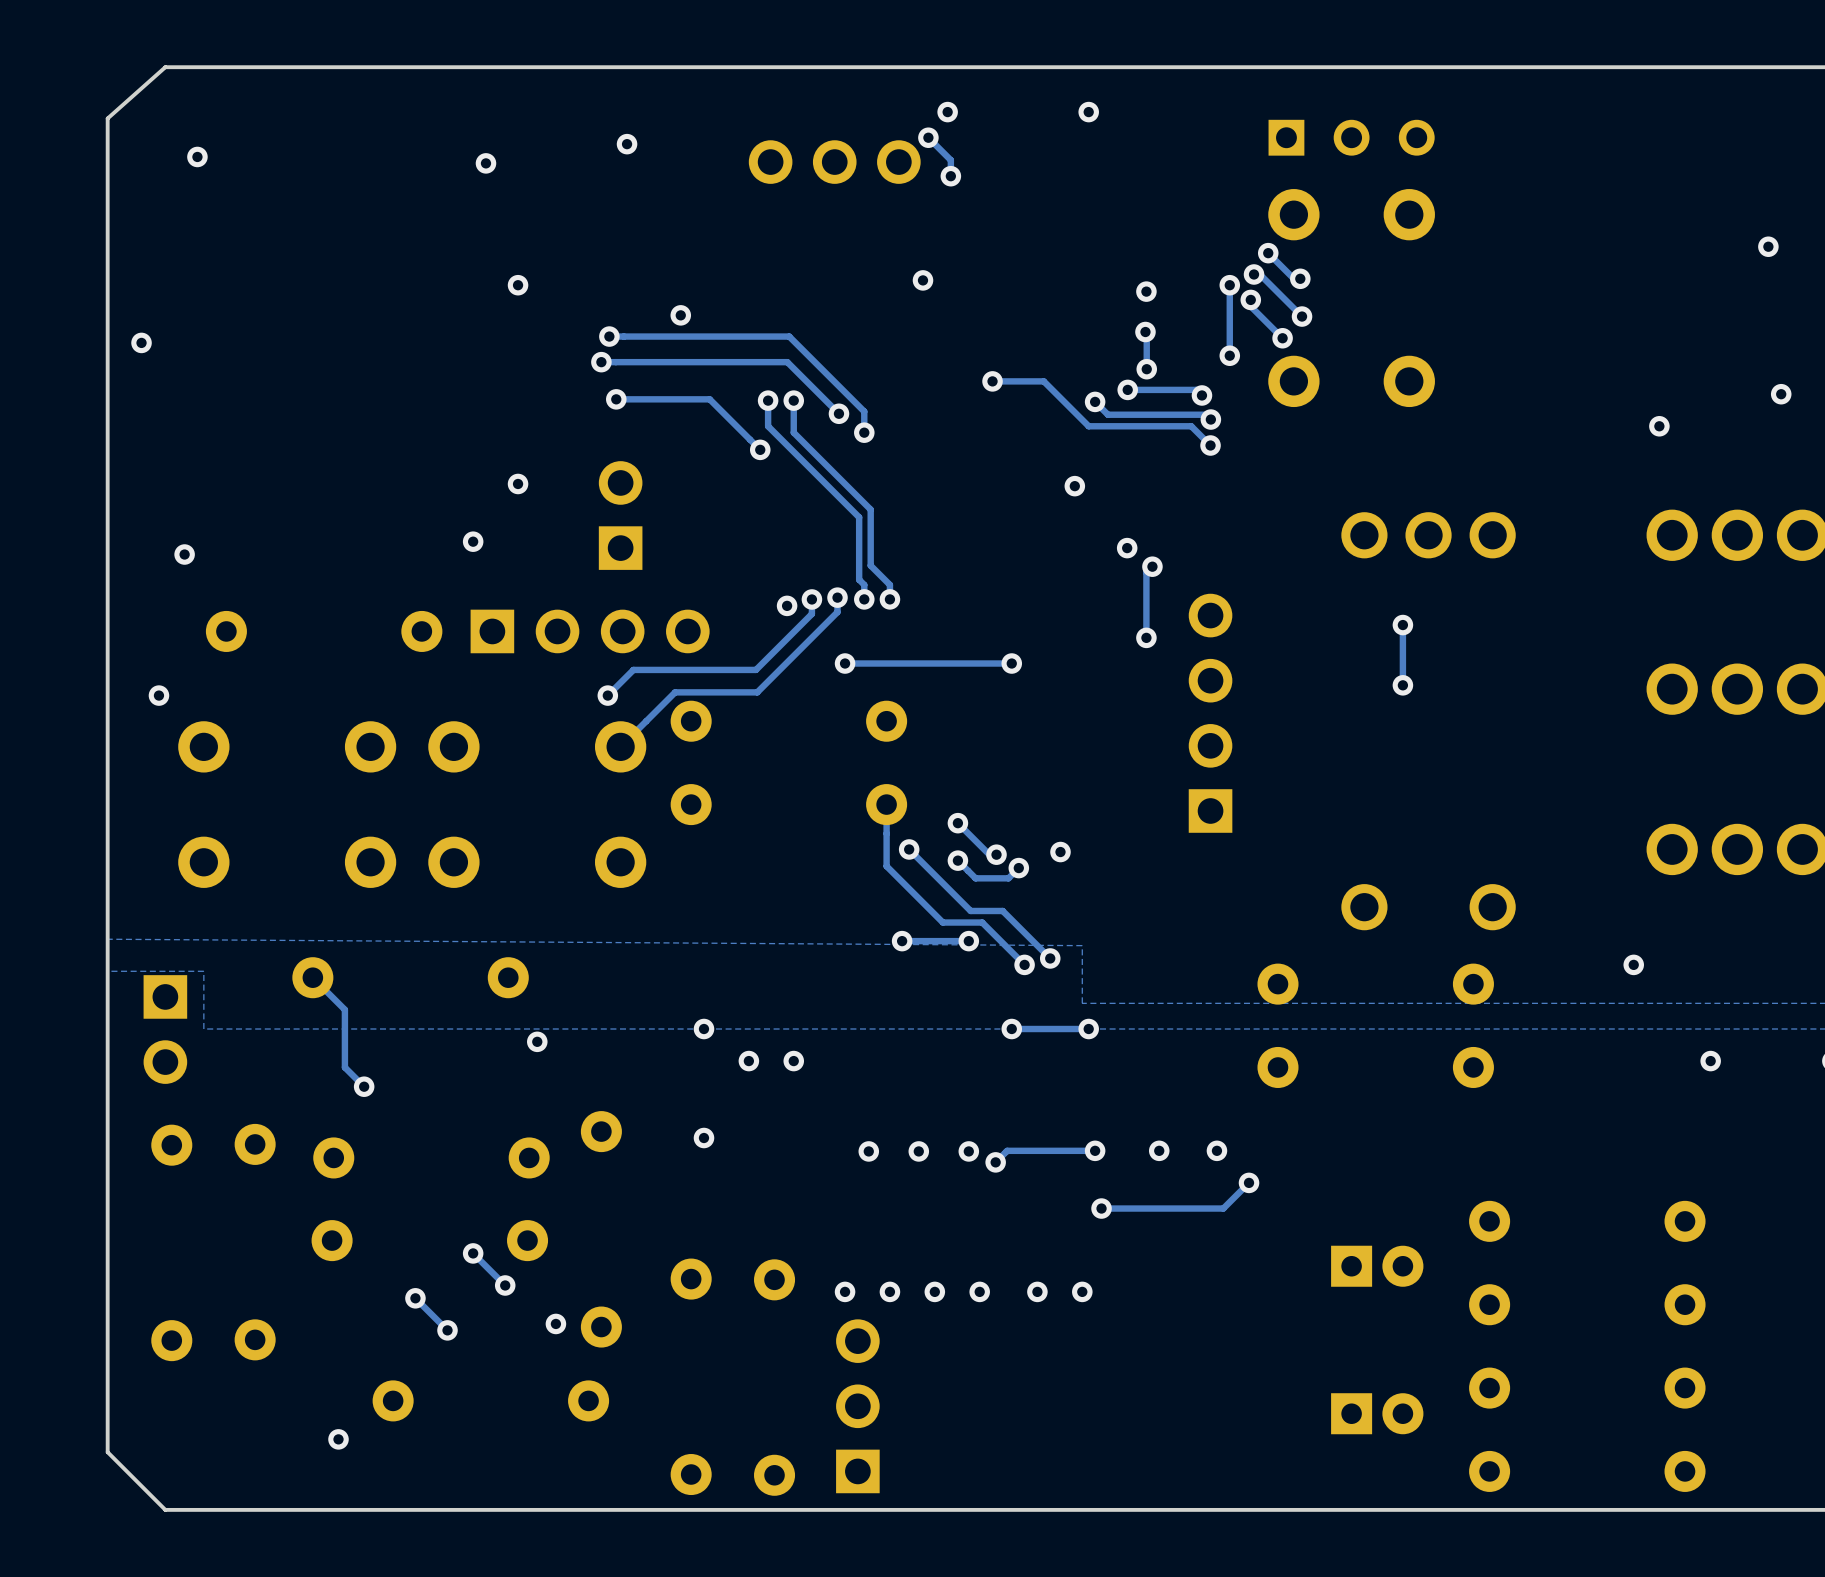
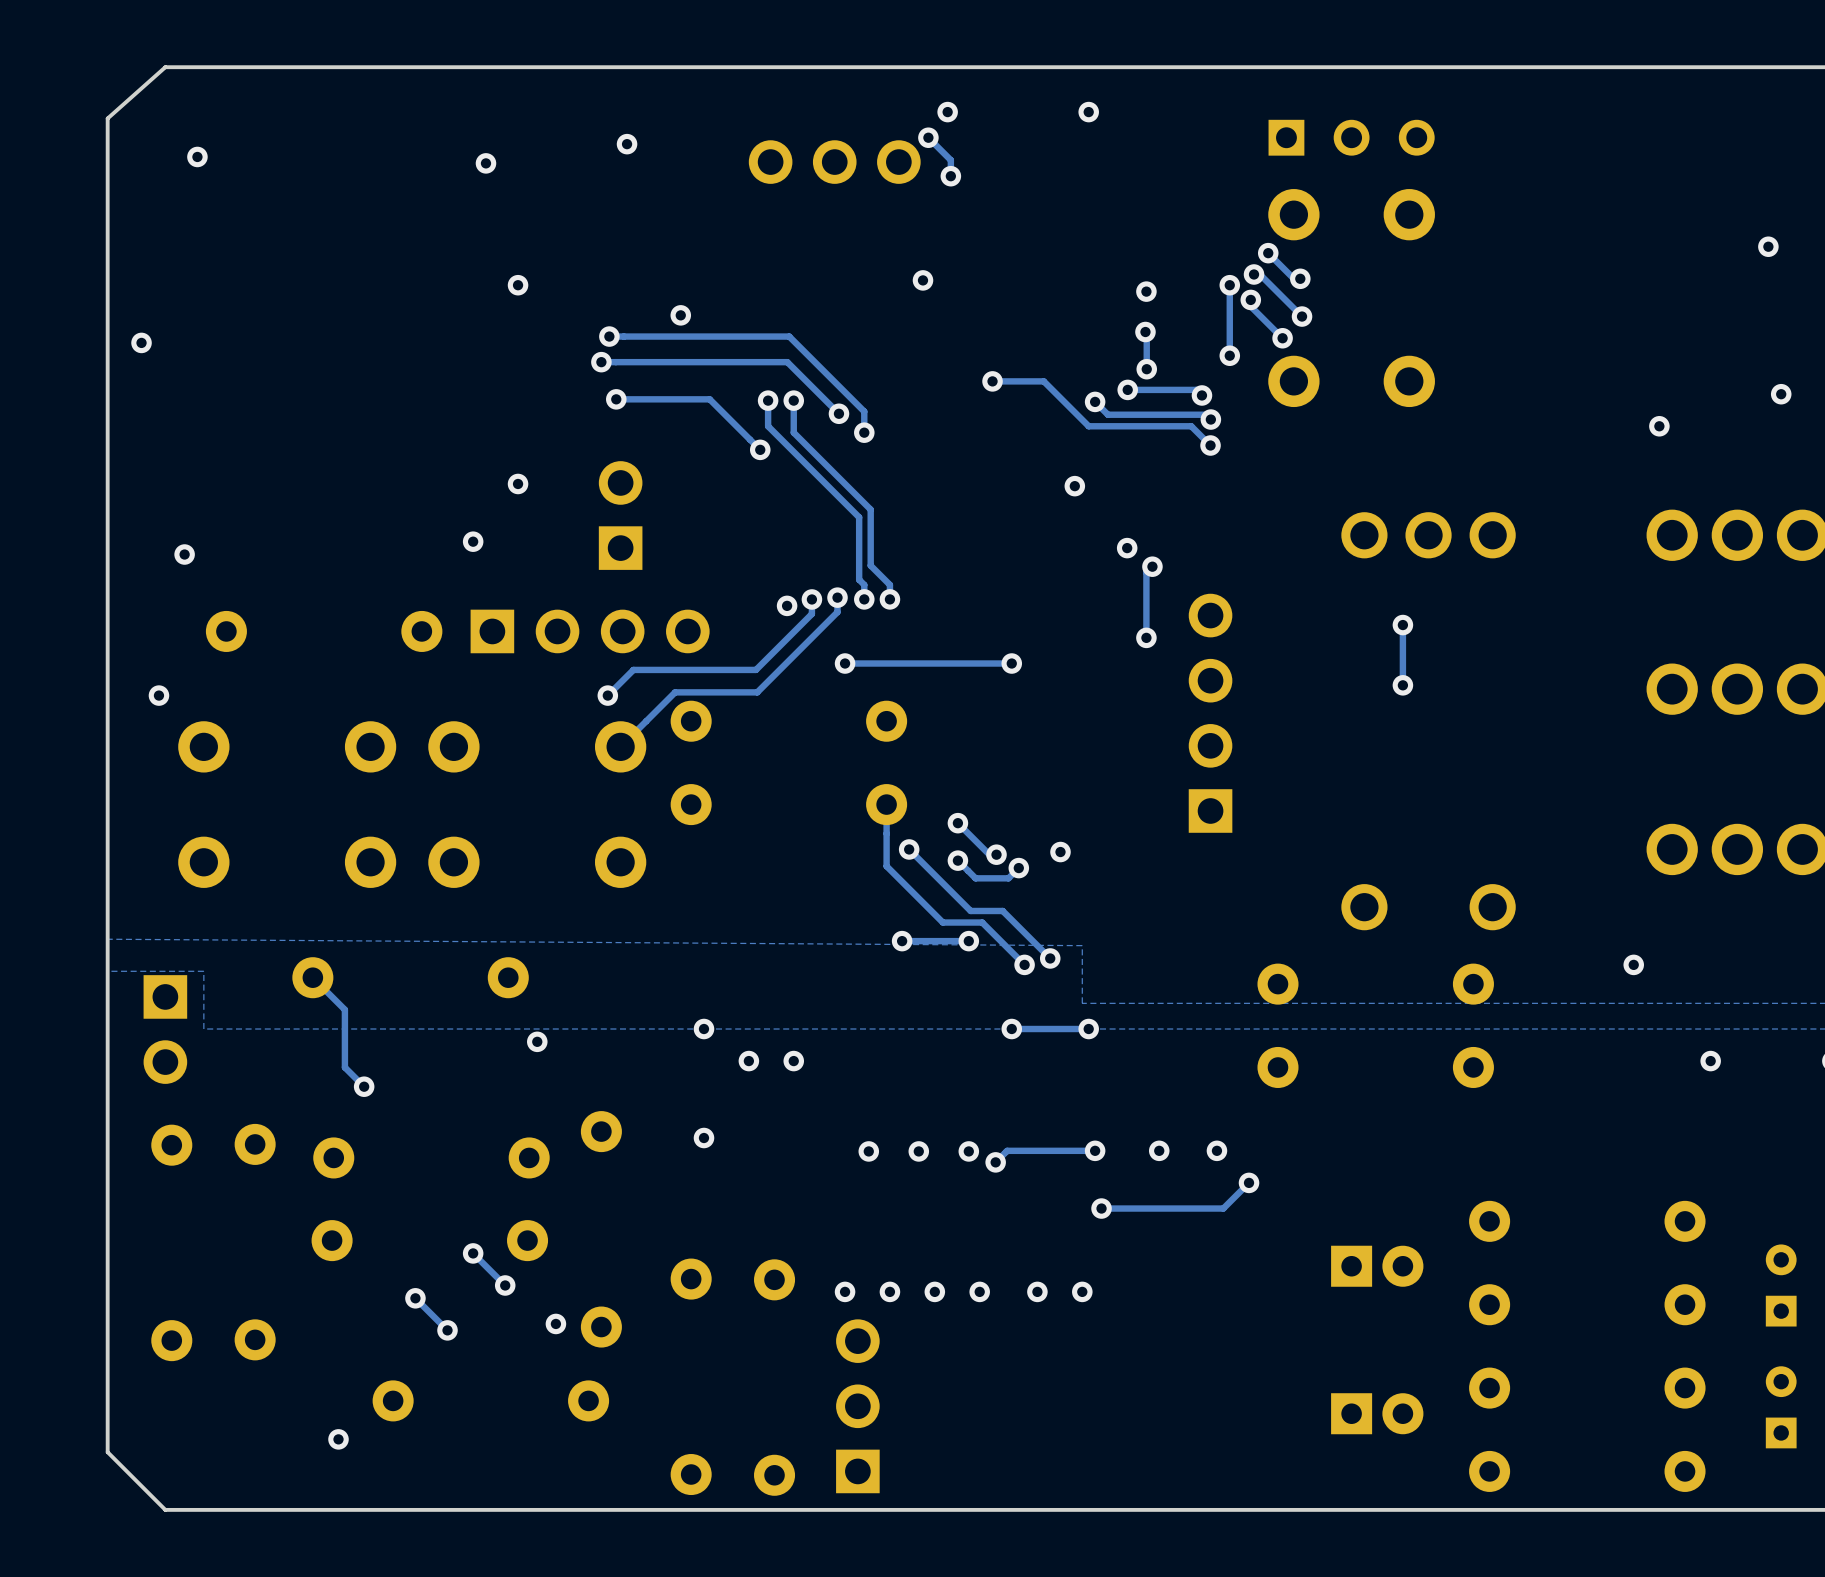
part: none -> (1781, 1285)
part: none -> (1781, 1407)

